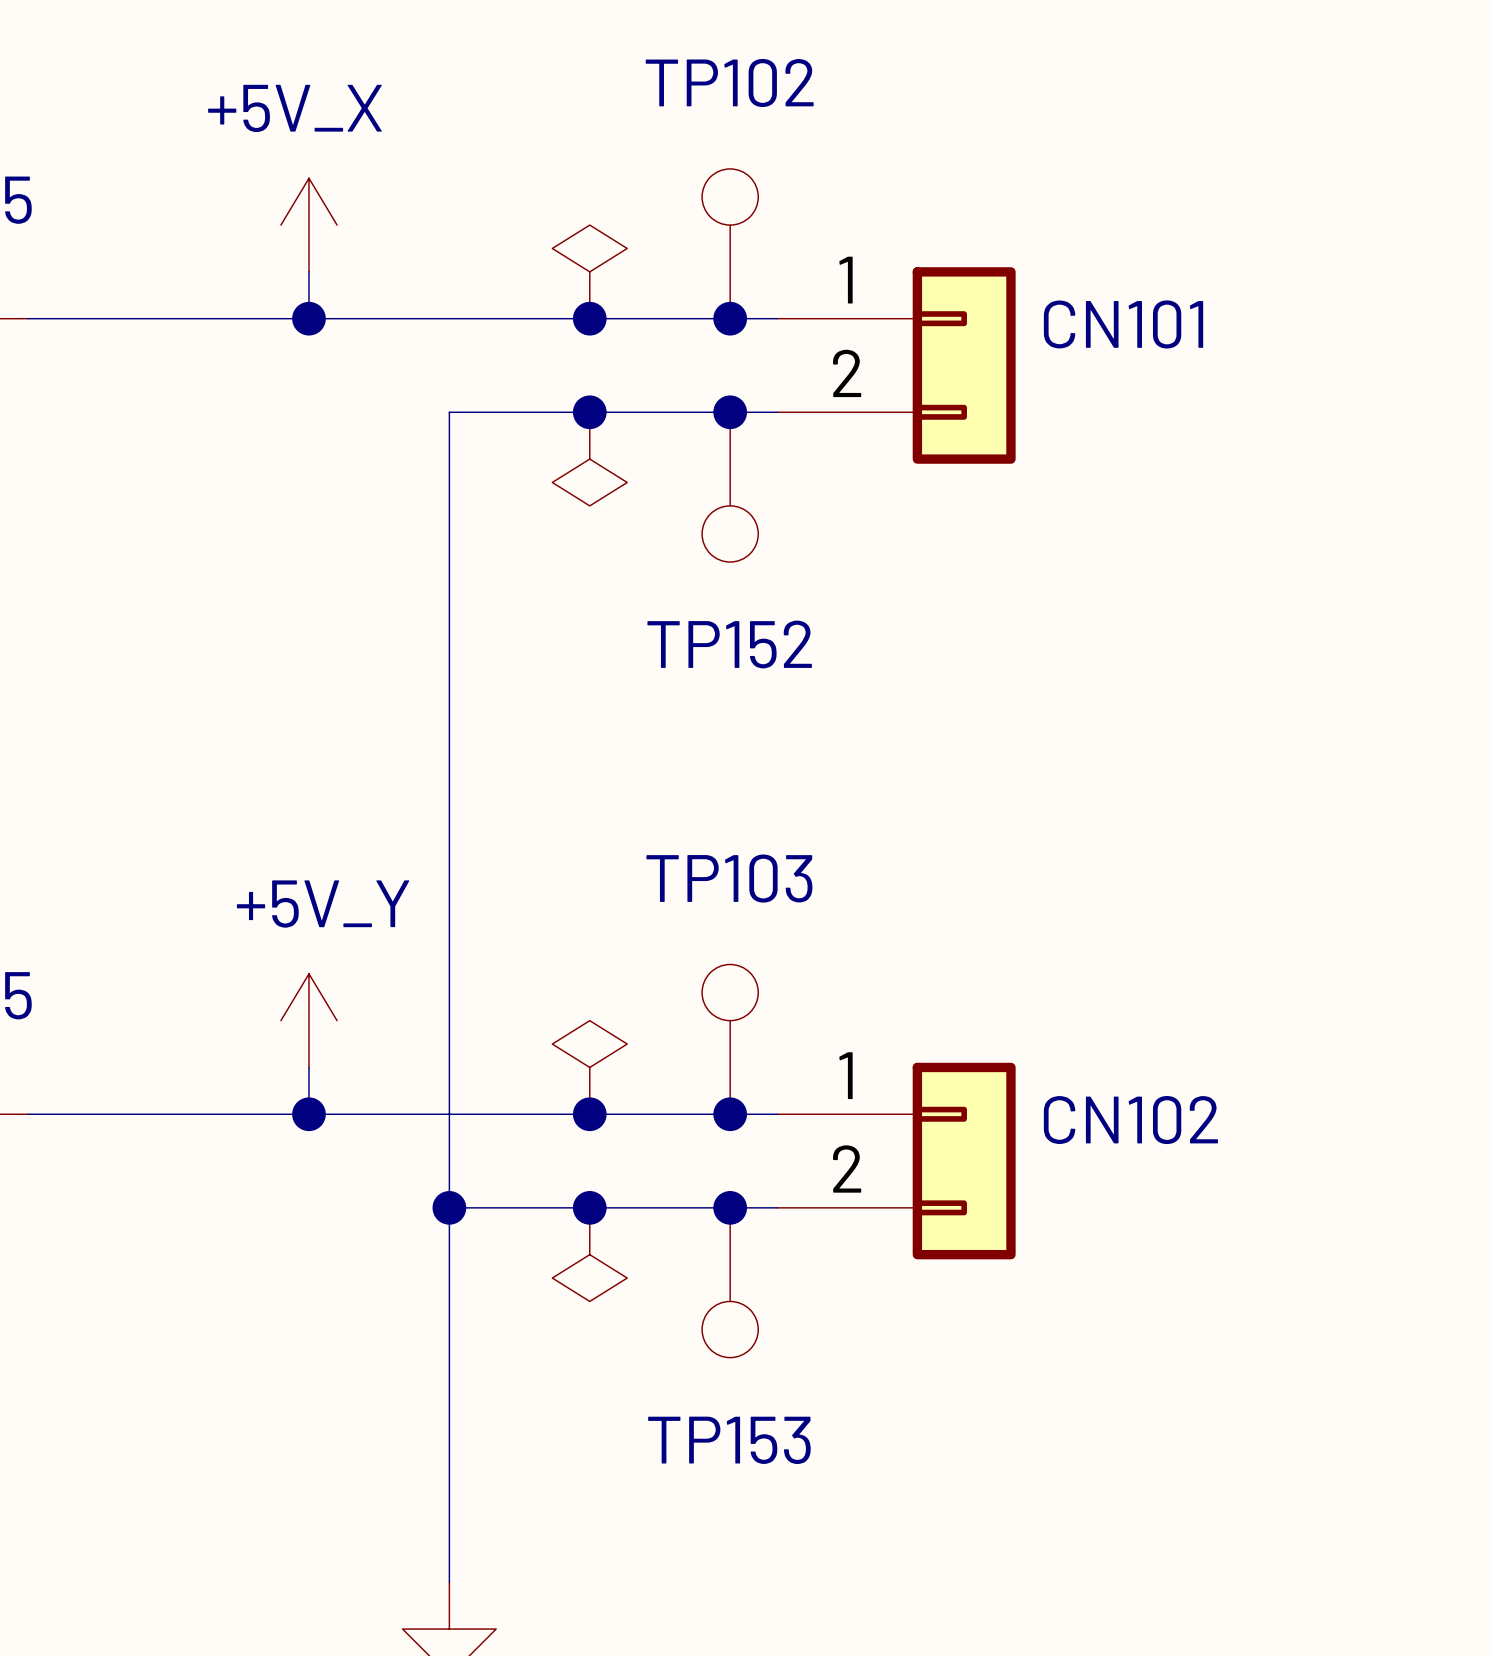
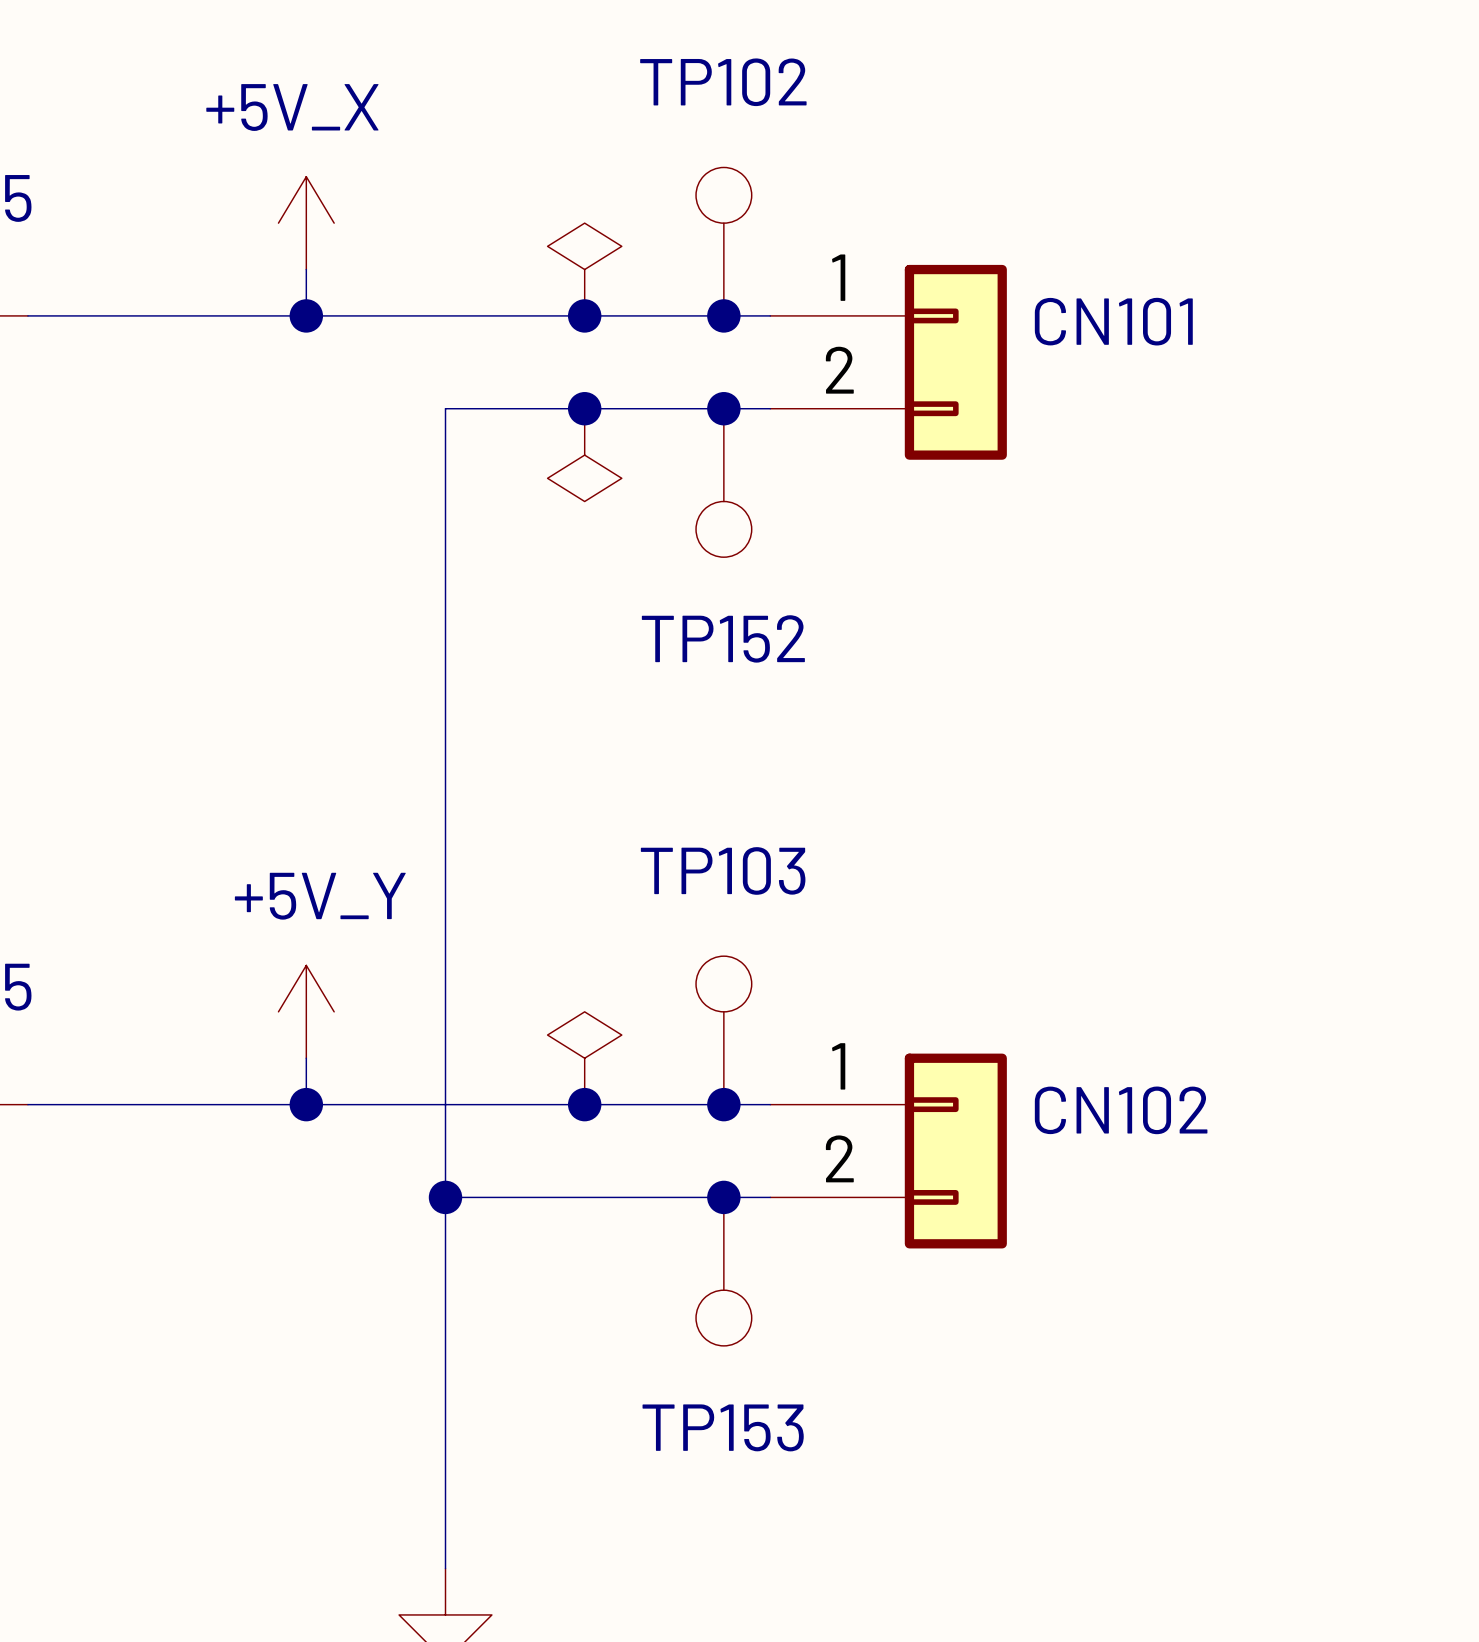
junction: (589, 1207) -> none
power symbol: (589, 1254) -> none

